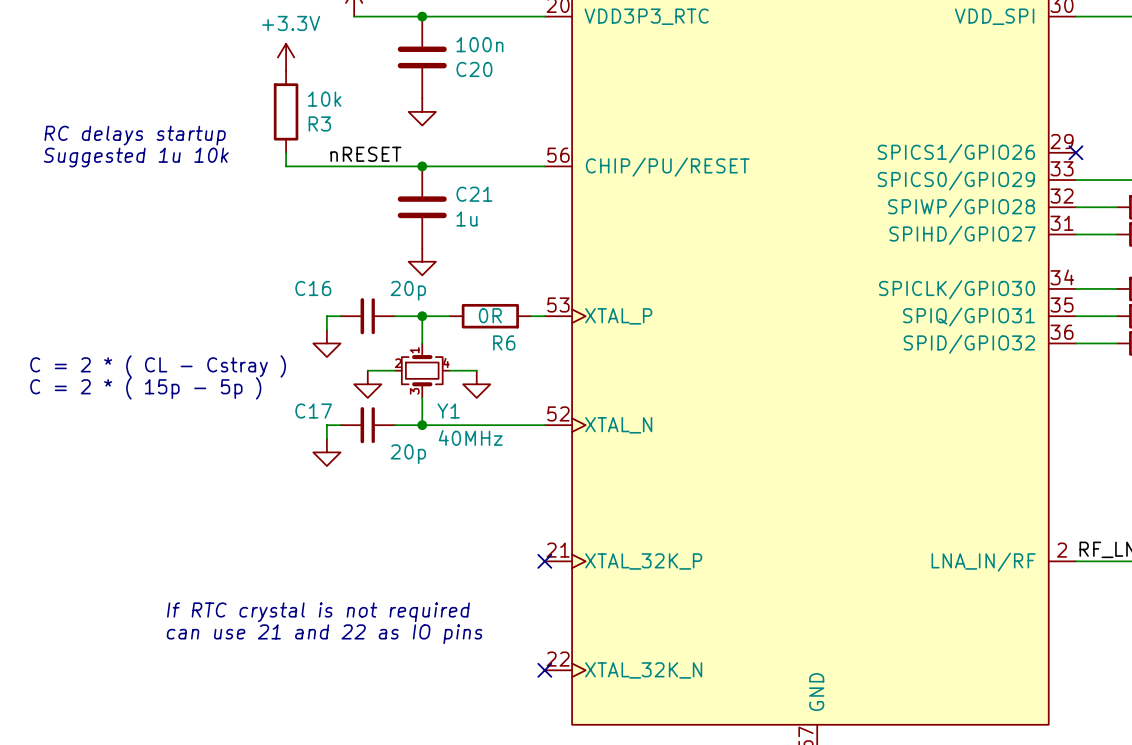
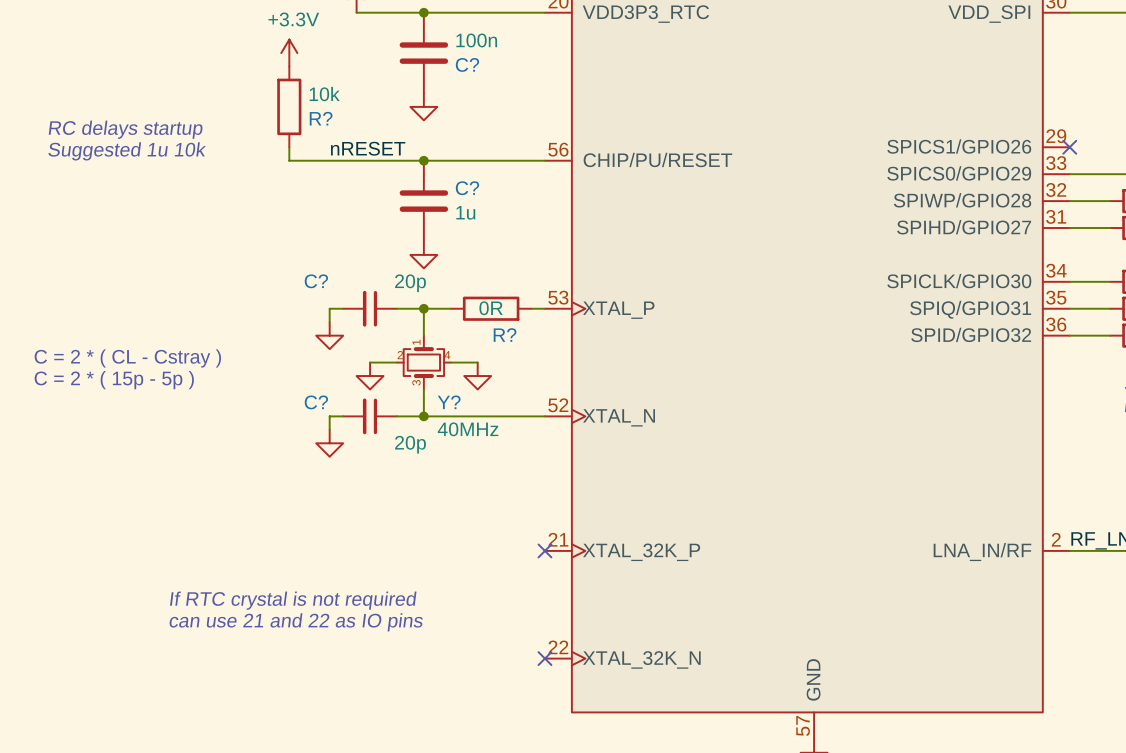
C20 name: C20 (474, 69) -> C? (467, 64)
R3 name: R3 (319, 123) -> R? (321, 118)
C21 name: C21 (474, 194) -> C? (467, 188)
C16 name: C16 (313, 288) -> C? (316, 281)
R6 name: R6 (504, 342) -> R? (505, 335)
C17 name: C17 (313, 411) -> C? (316, 402)
Y1 name: Y1 (448, 411) -> Y? (449, 402)

